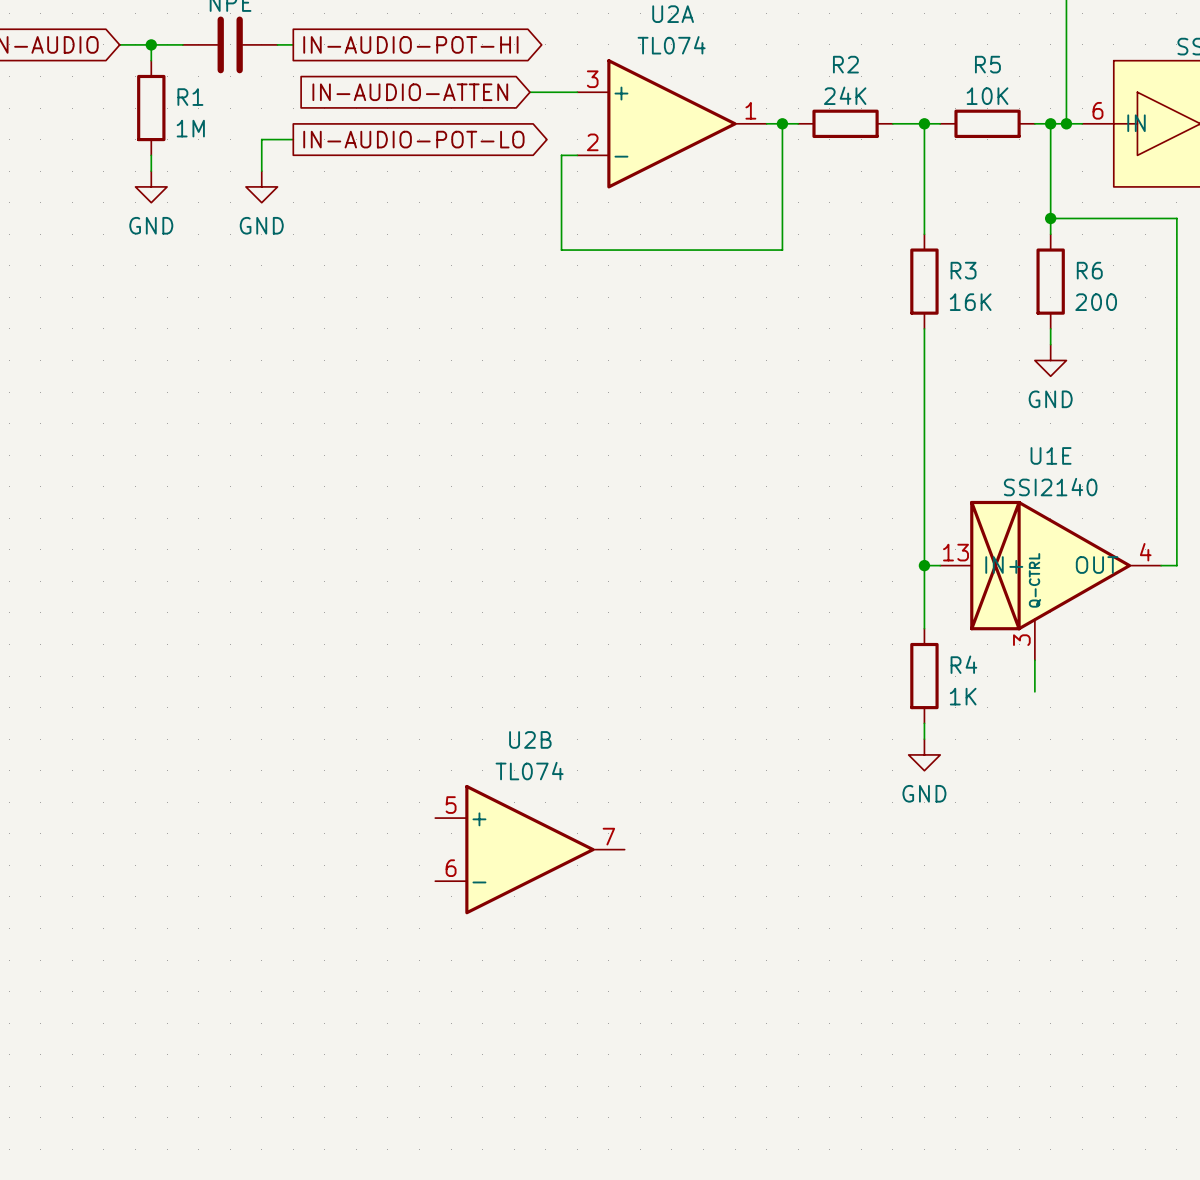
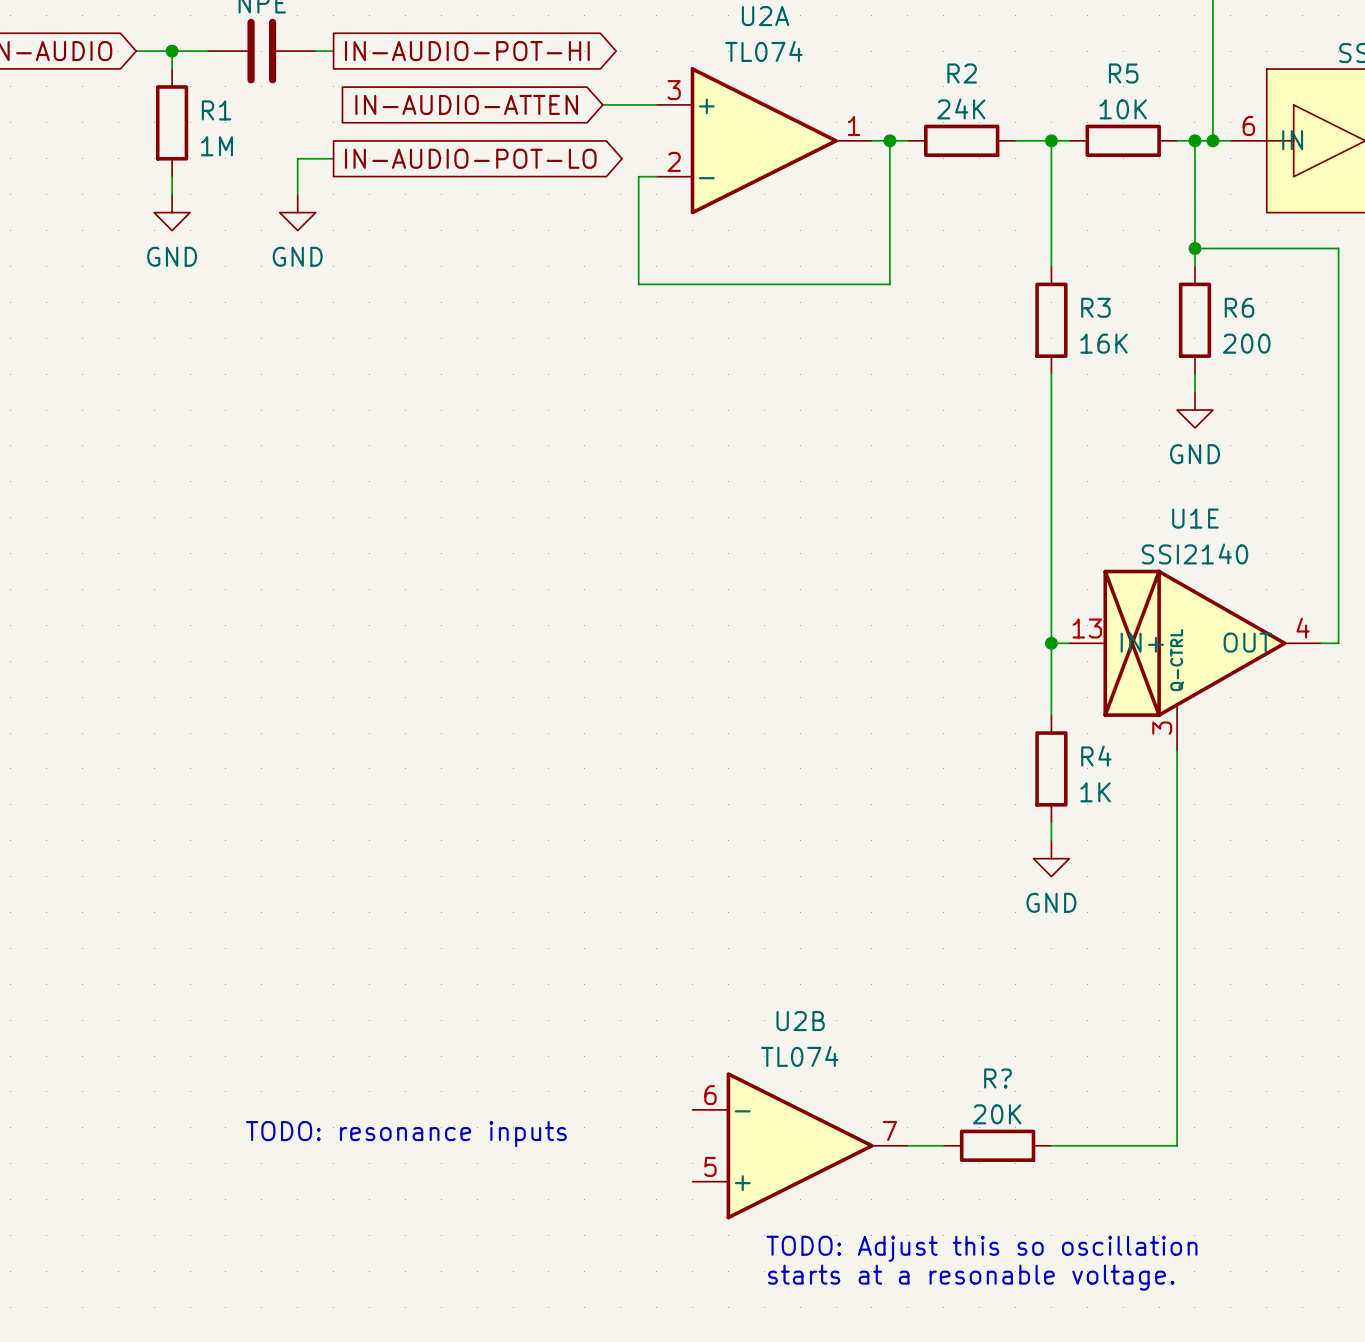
wire: none -> (1177, 786) (1177, 1145) (1051, 1145)
U2B flip: as is (529, 849) -> up-down (800, 1145)
U2B position: (529, 849) -> (800, 1145)
text: none -> TODO: resonance inputs (406, 1134)
wire: none -> (907, 1145) (943, 1145)
R?: none -> 20K (997, 1145)
text: none -> TODO: Adjust this so oscillation (981, 1248)
text: none -> starts at a resonable voltage. (971, 1277)

